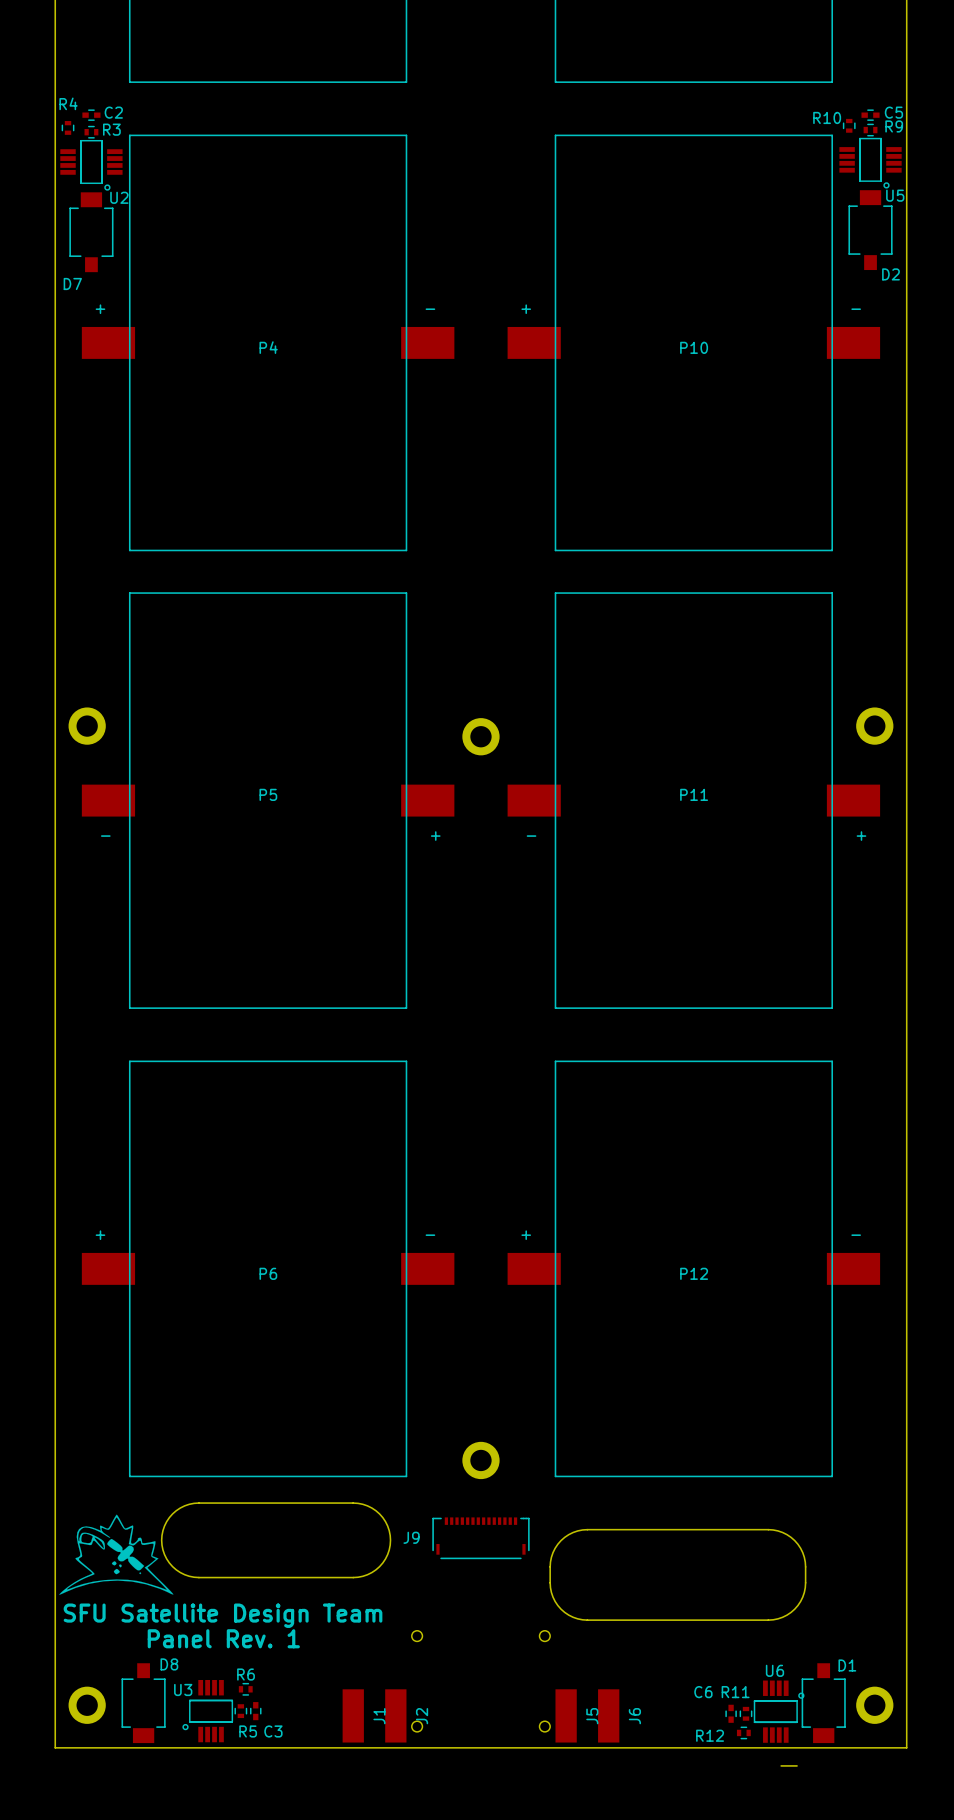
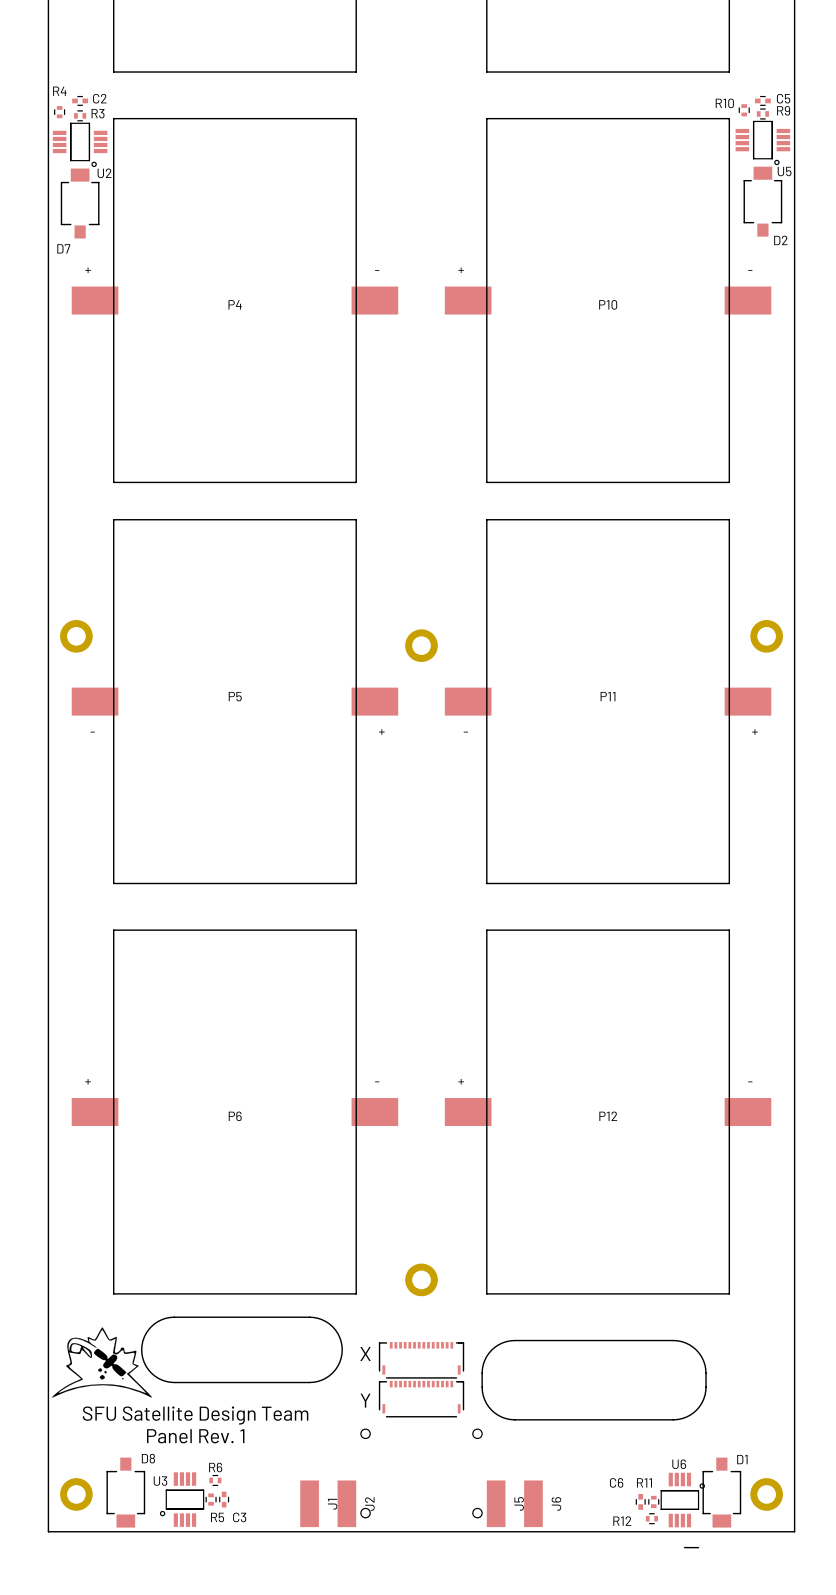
J9: (480, 1538) -> none
text: none -> X (365, 1354)
part: none -> (421, 1360)
part: none -> (421, 1399)
text: none -> Y (365, 1400)

